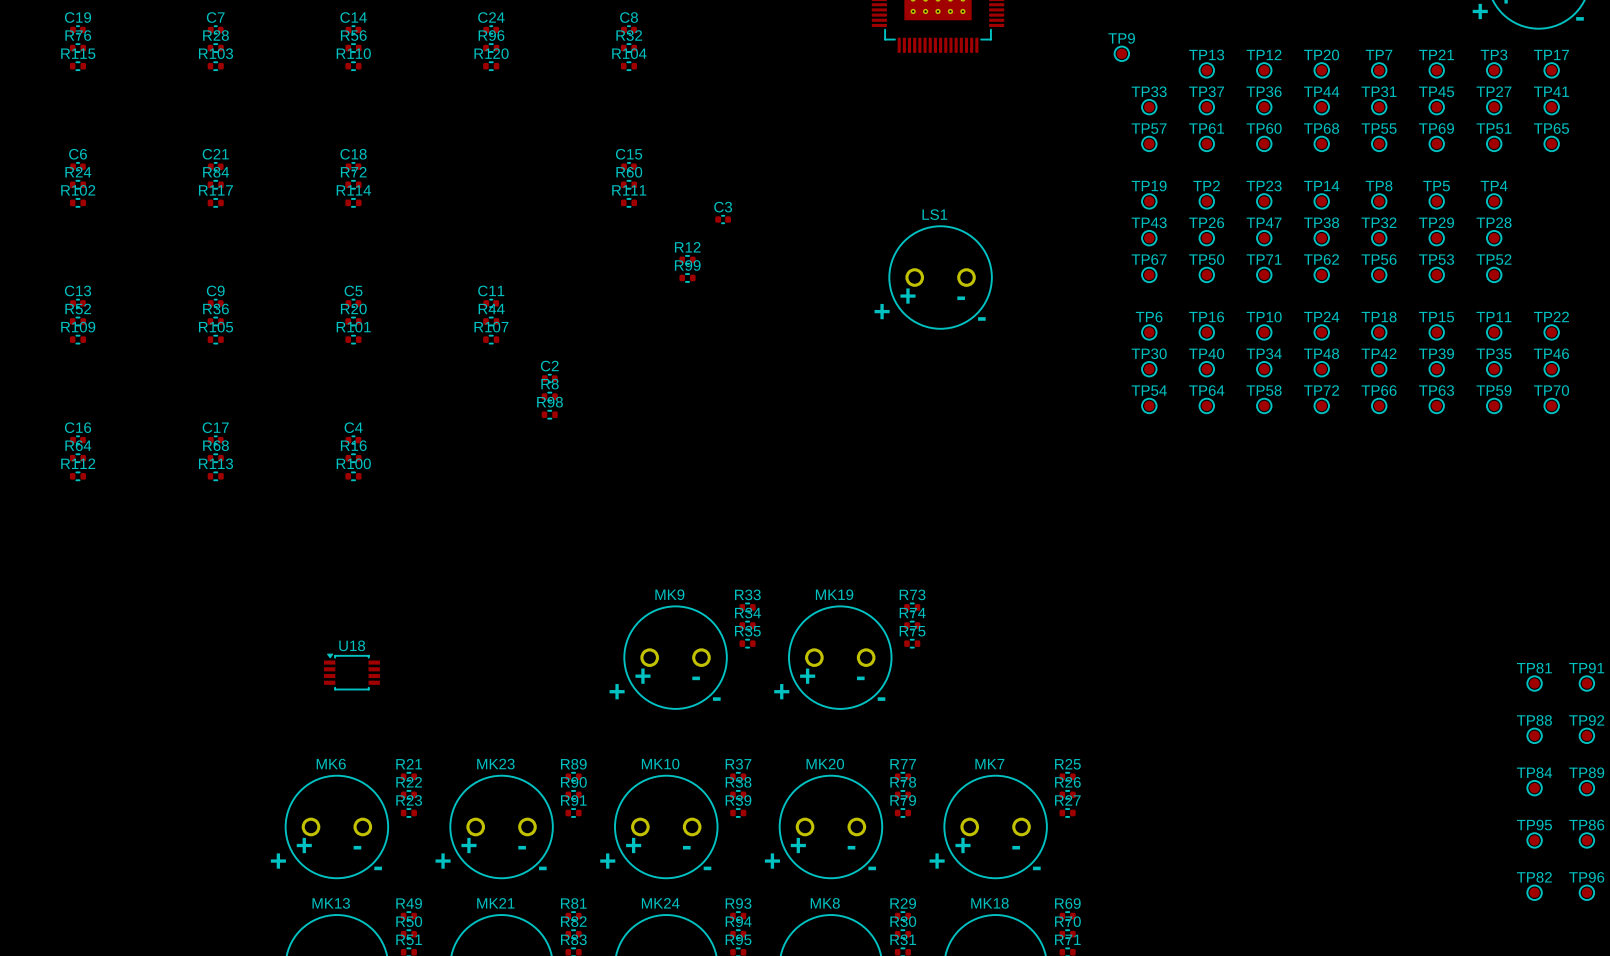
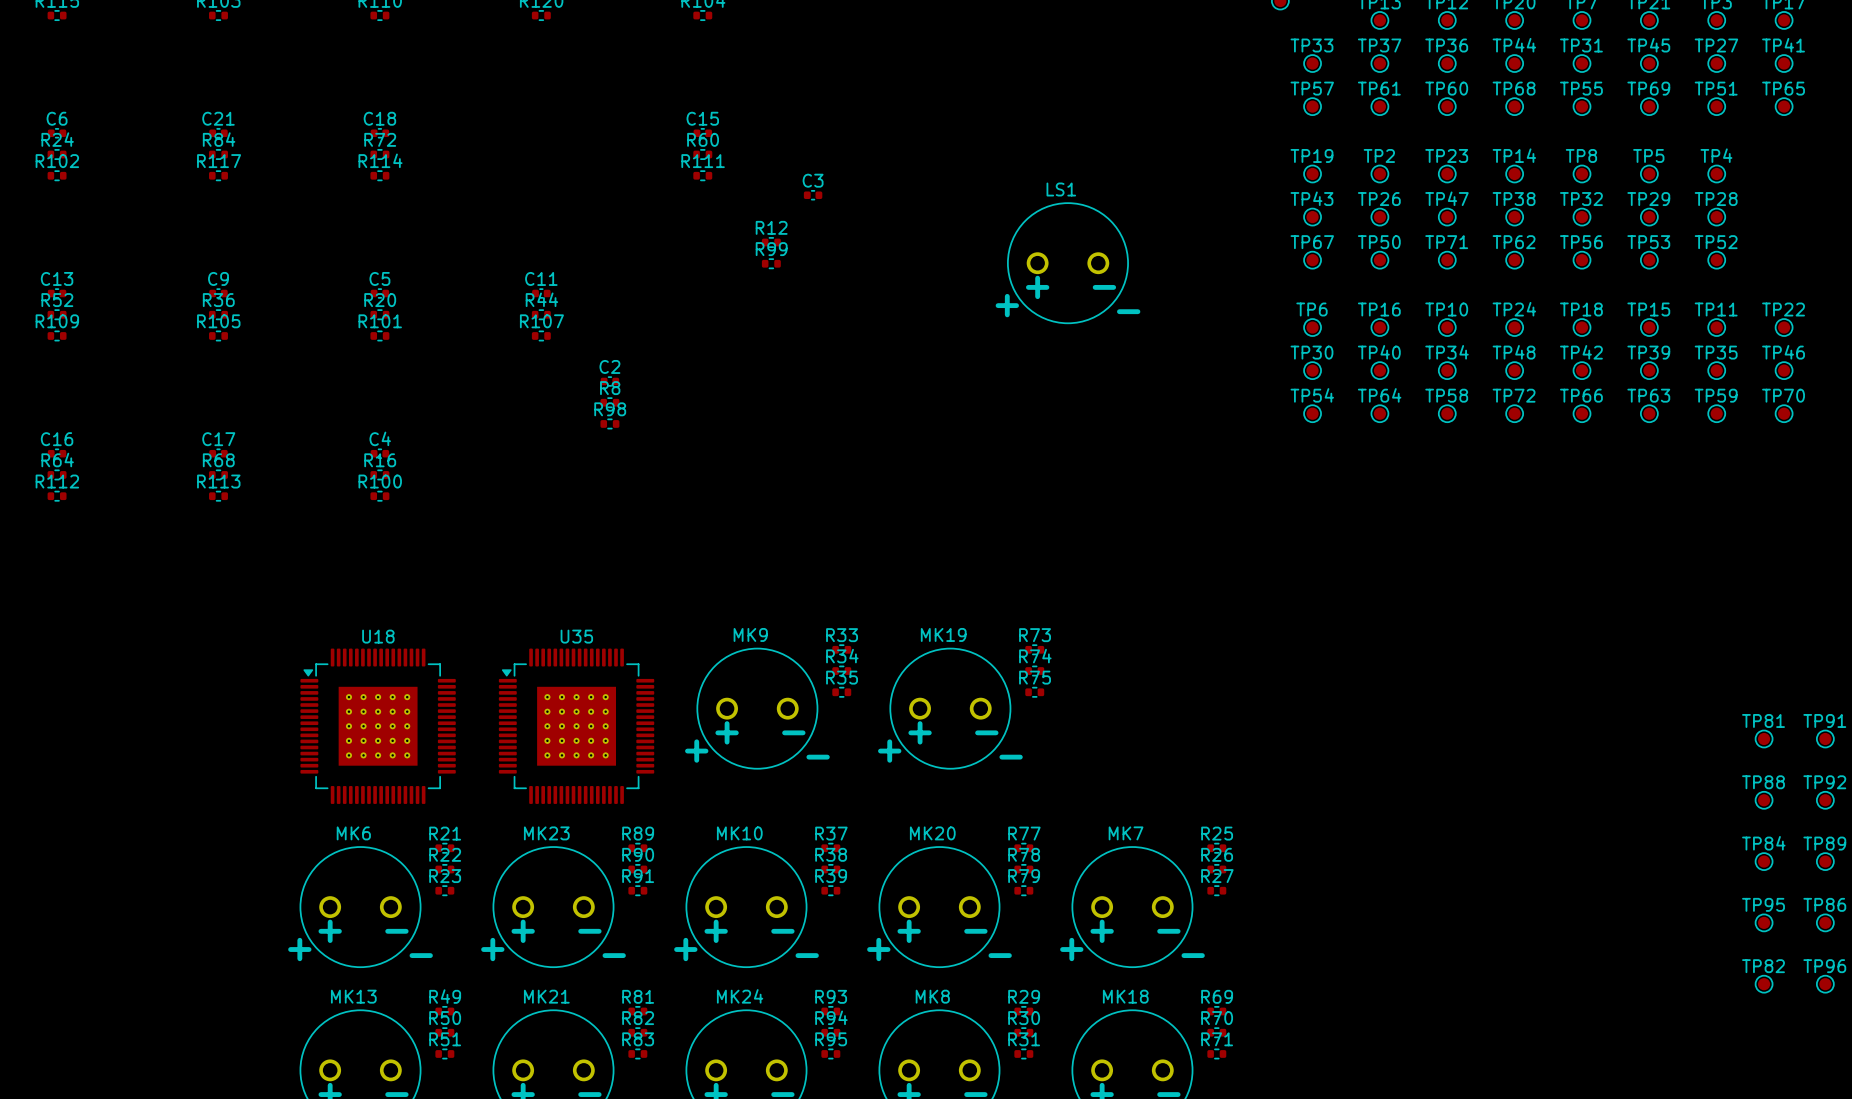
U18 name position: U18 (352, 645) -> U18 (378, 636)
U18 footprint: [323, 653, 380, 691] -> [300, 648, 456, 804]
U35: none -> (576, 726)

